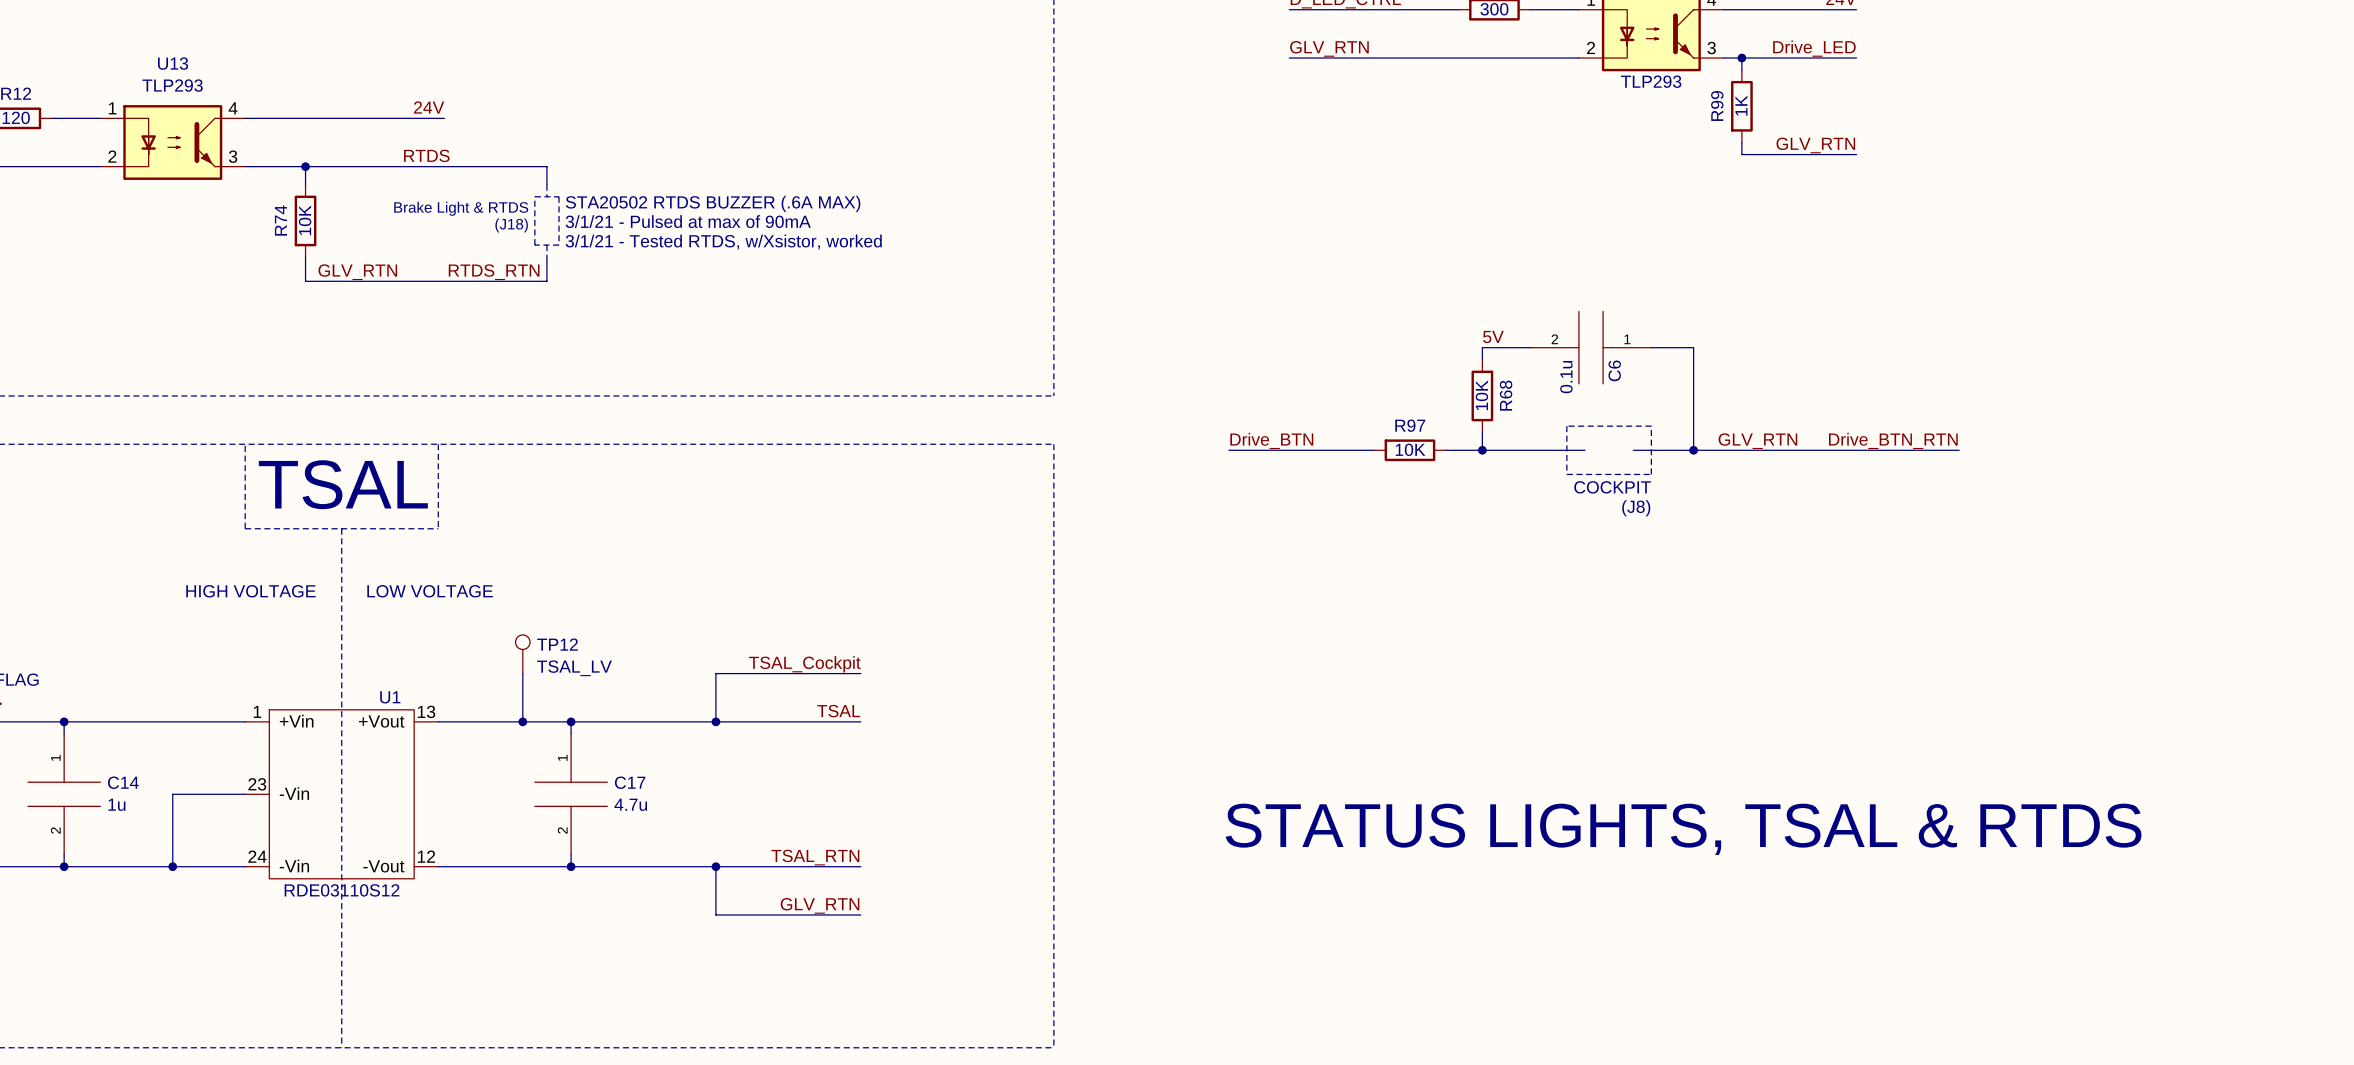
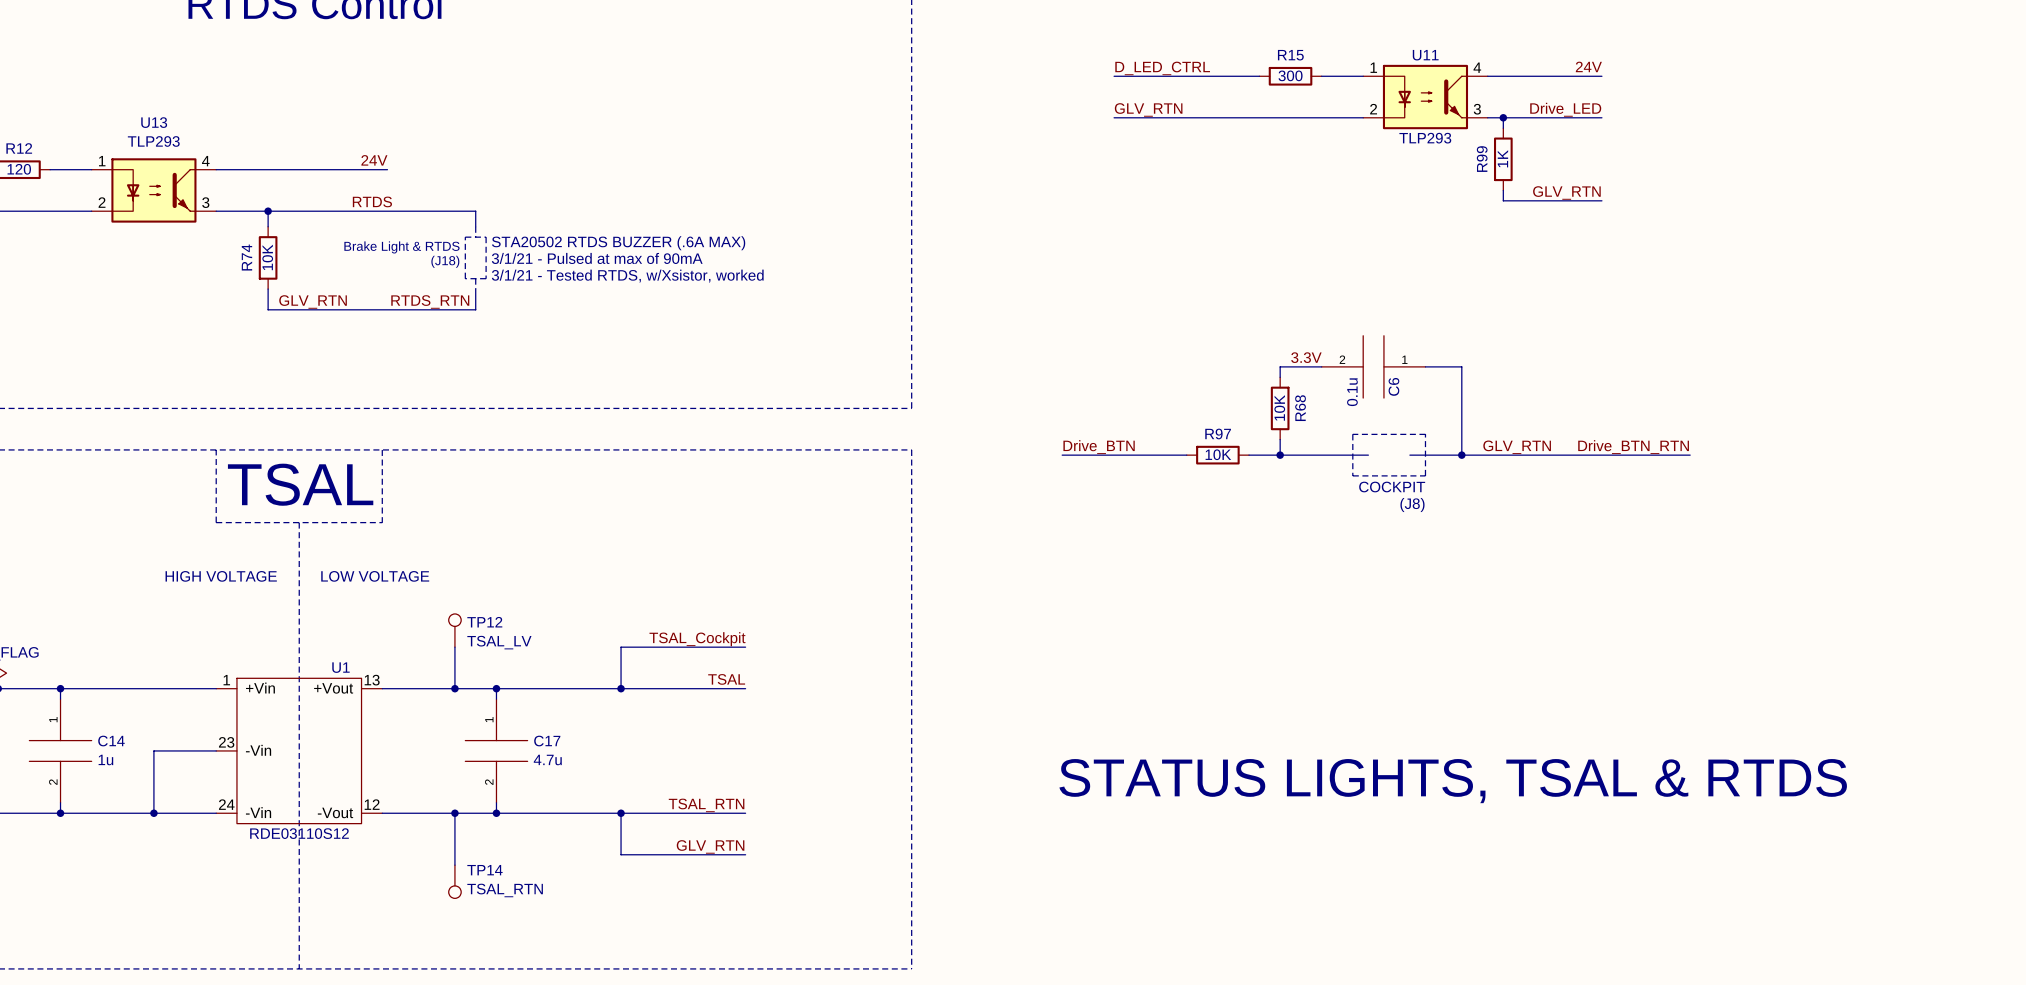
label: none -> 3.3V (1306, 357)
label: 5V (1493, 337) -> none
wire: none -> (454, 813) (454, 865)
junction: none -> (454, 813)
TP14: none -> TSAL_RTN (454, 881)

